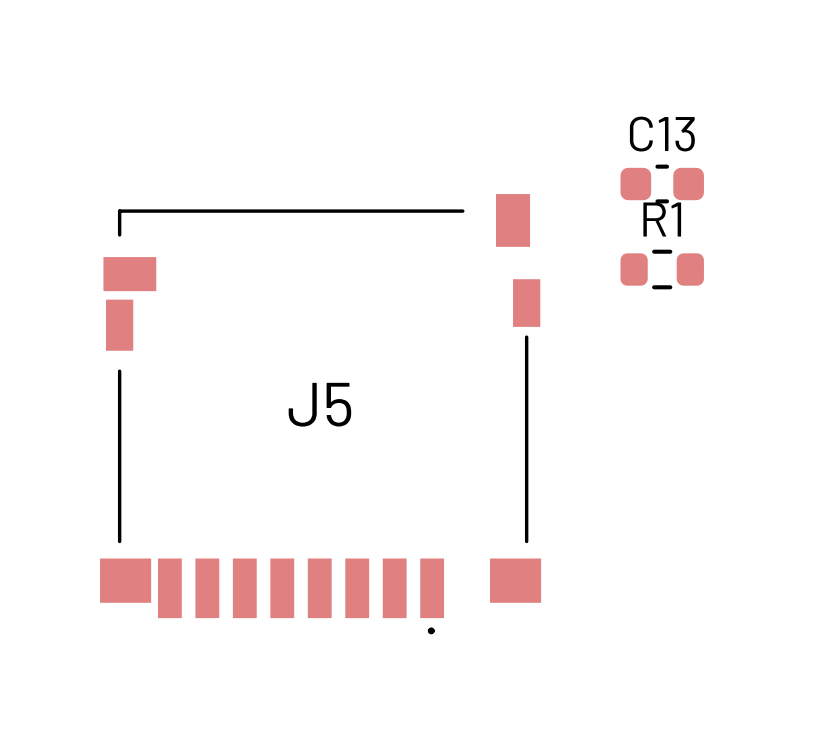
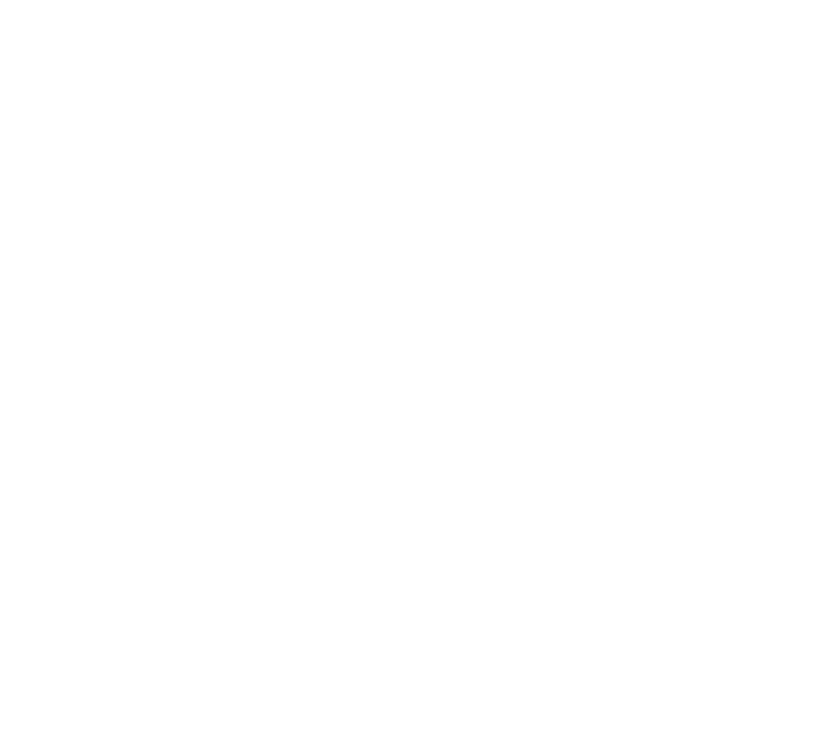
C13: (662, 184) -> none
R1: (662, 269) -> none
J5: (320, 414) -> none

